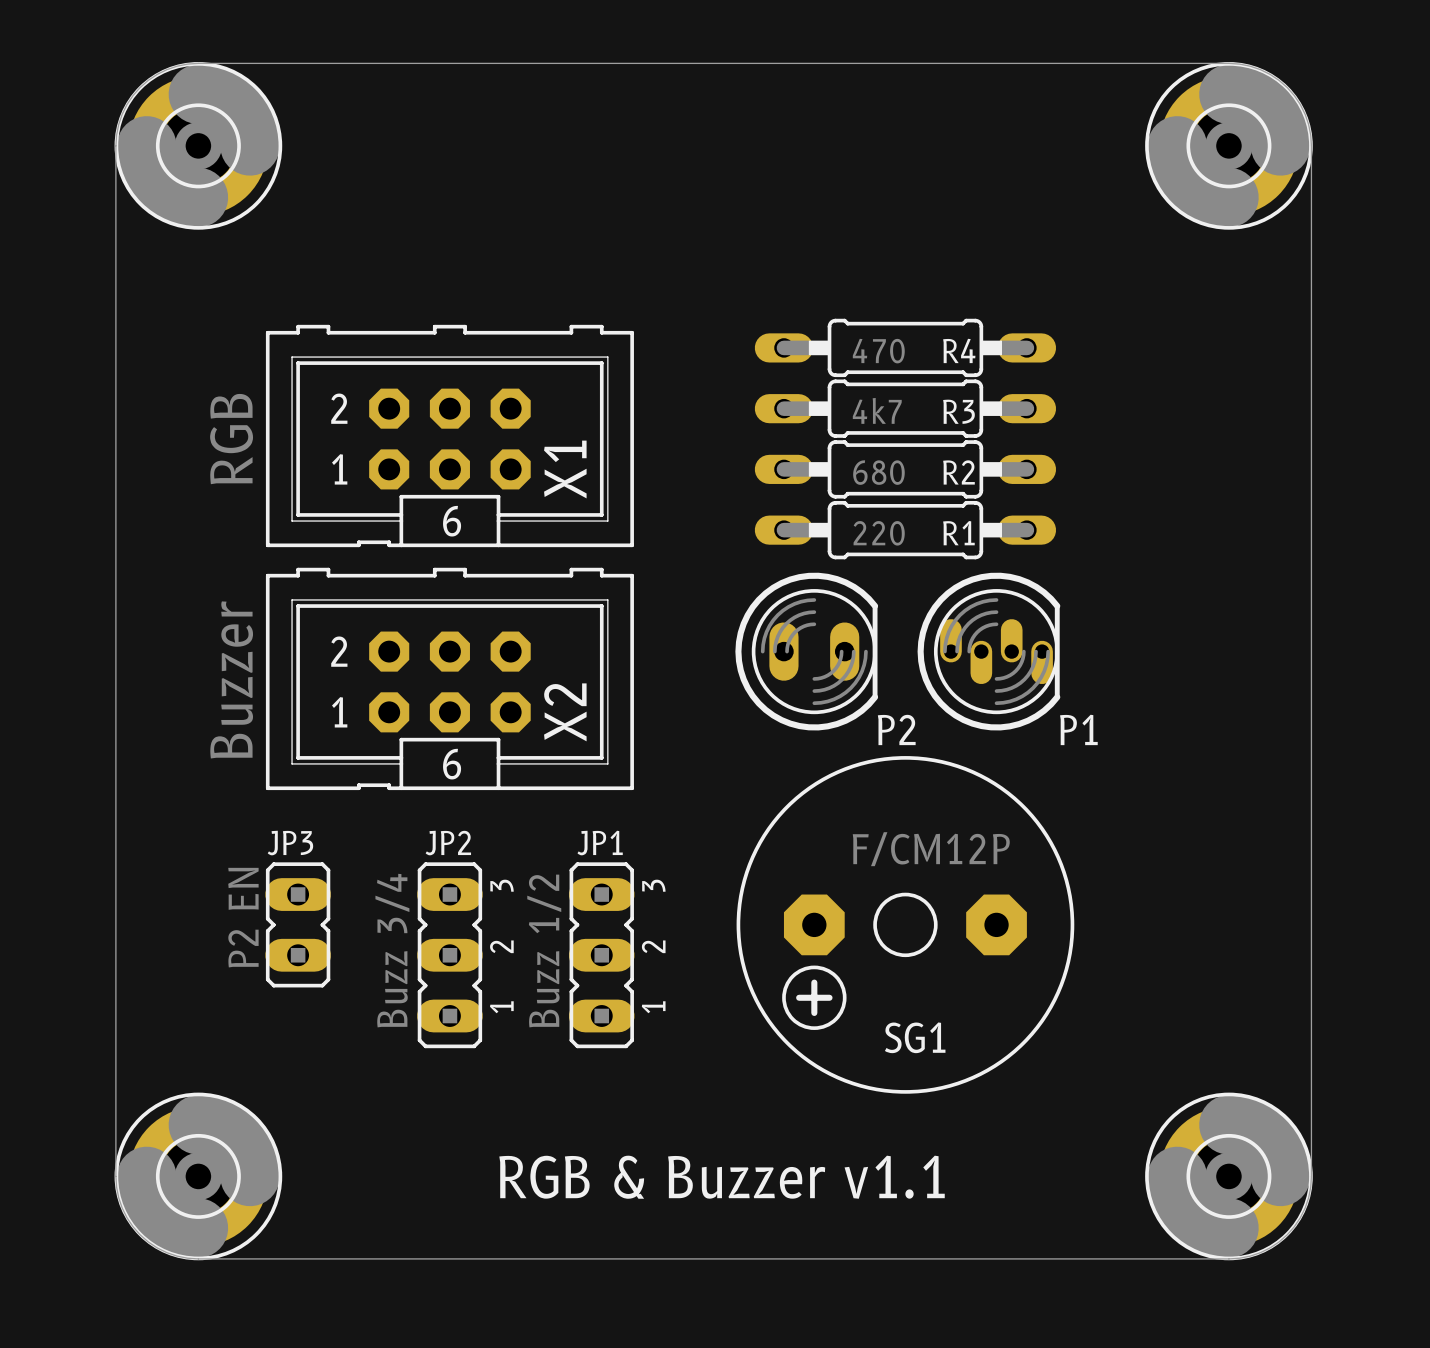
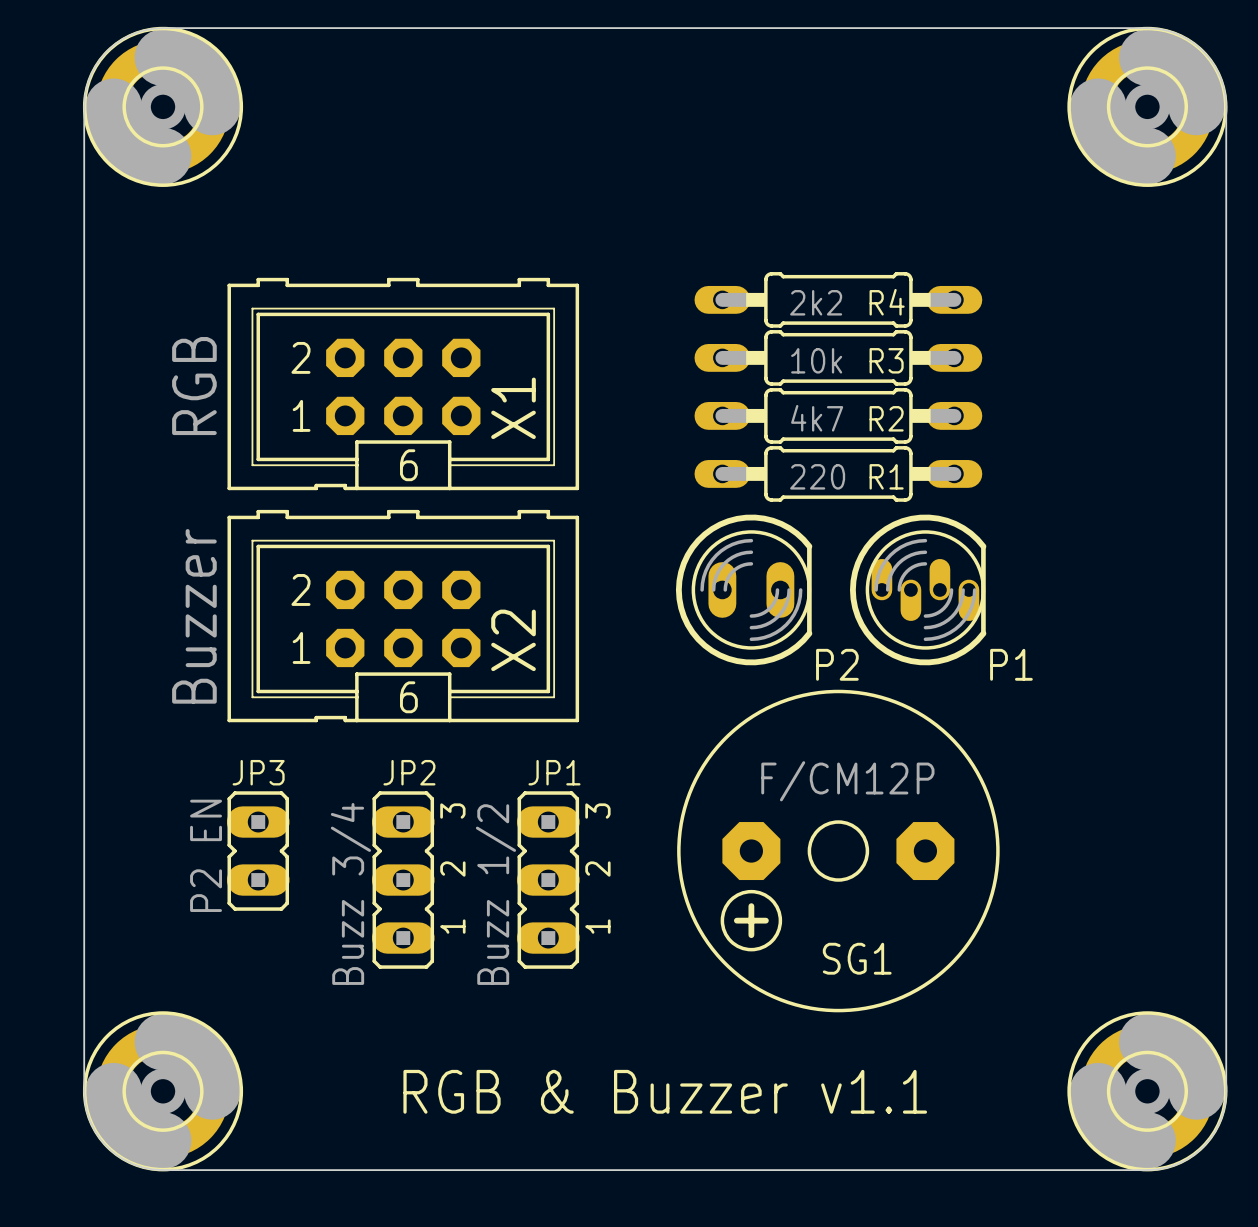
R4 value: 470 (878, 351) -> 2k2 (816, 302)
R3 value: 4k7 (877, 410) -> 10k (816, 360)
R2 value: 680 (878, 472) -> 4k7 (817, 418)

